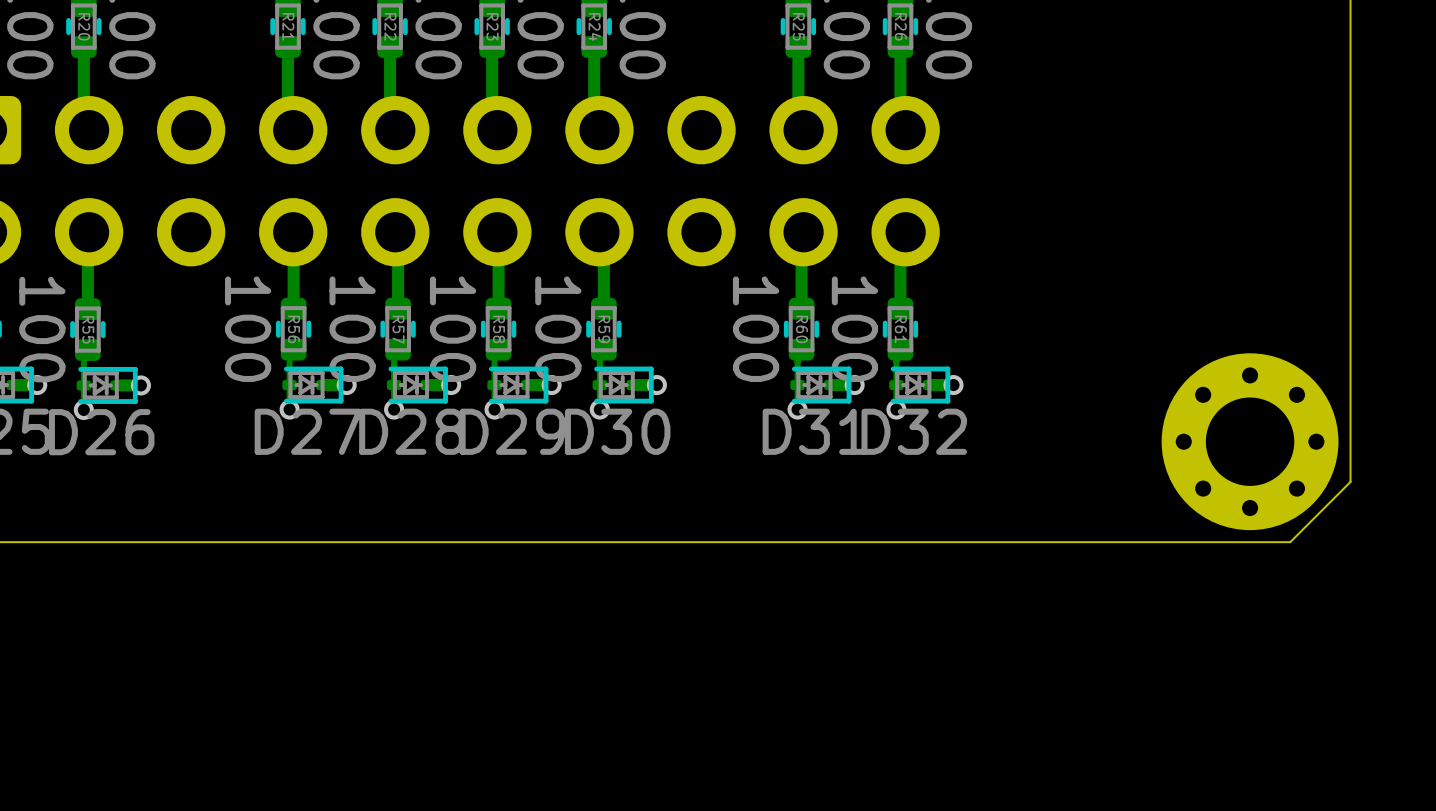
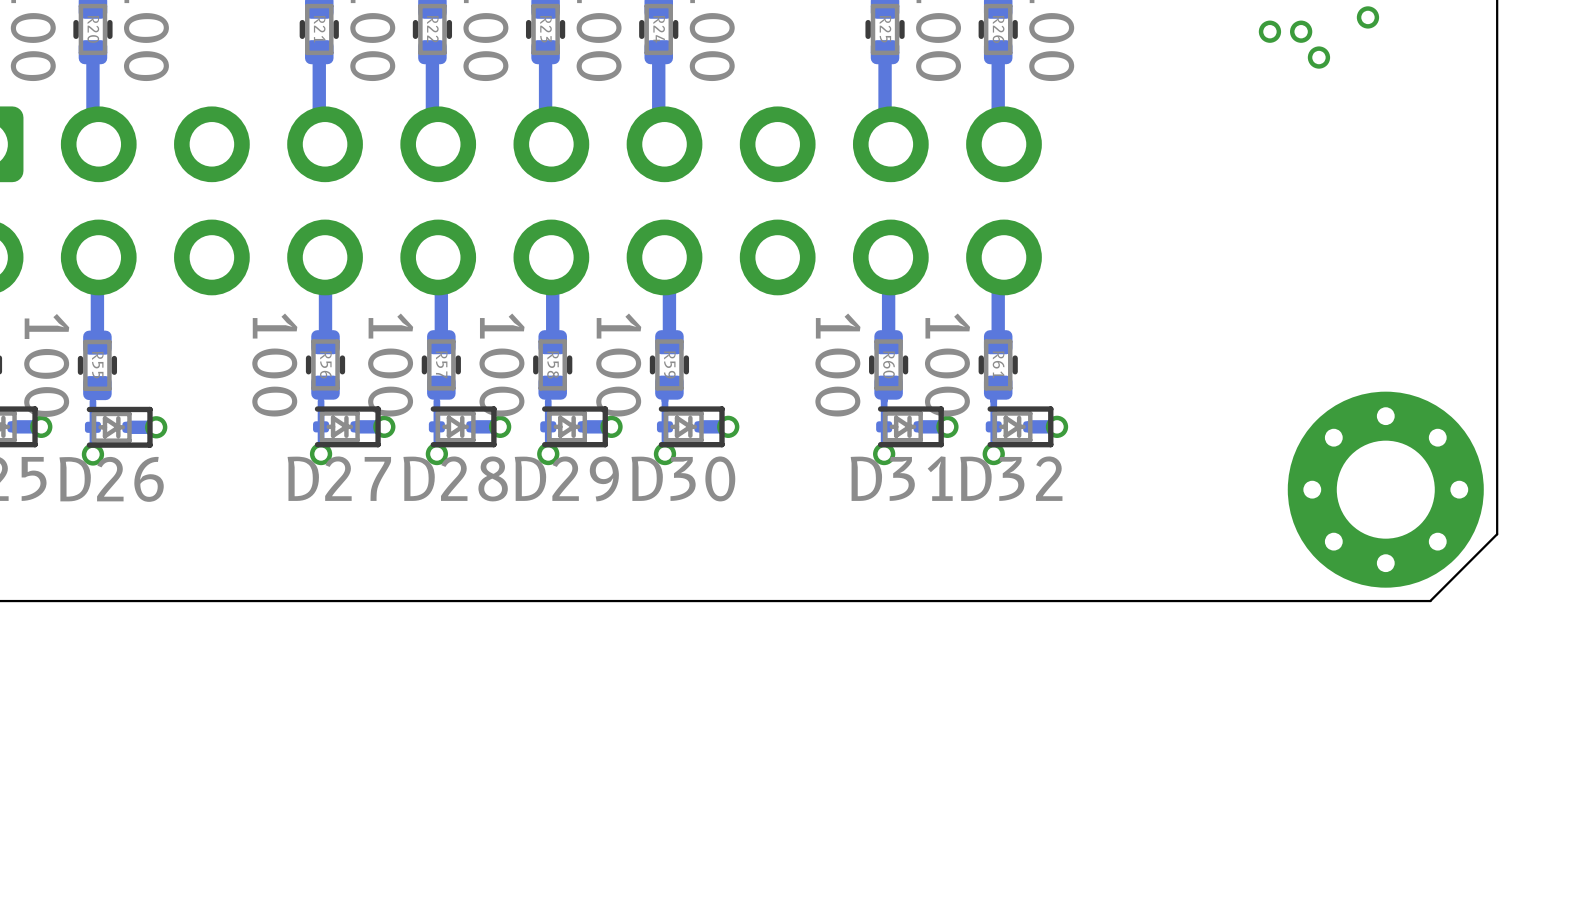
via: none -> (1367, 17)
via: none -> (1269, 31)
via: none -> (1301, 31)
via: none -> (1318, 57)

